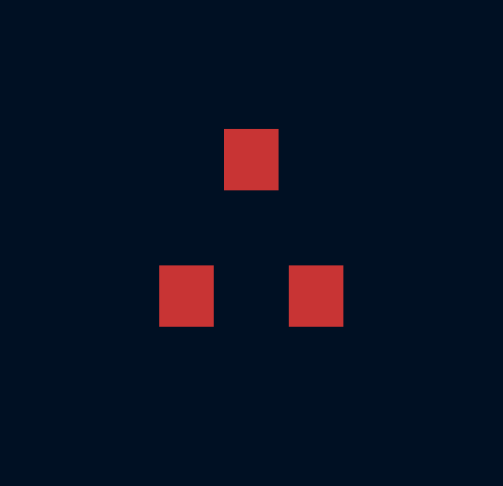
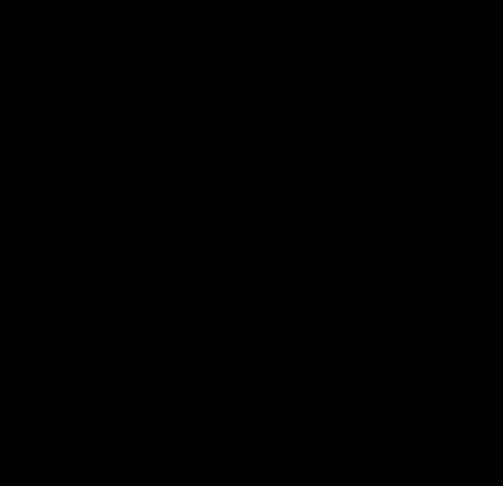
part: (251, 227) -> none

